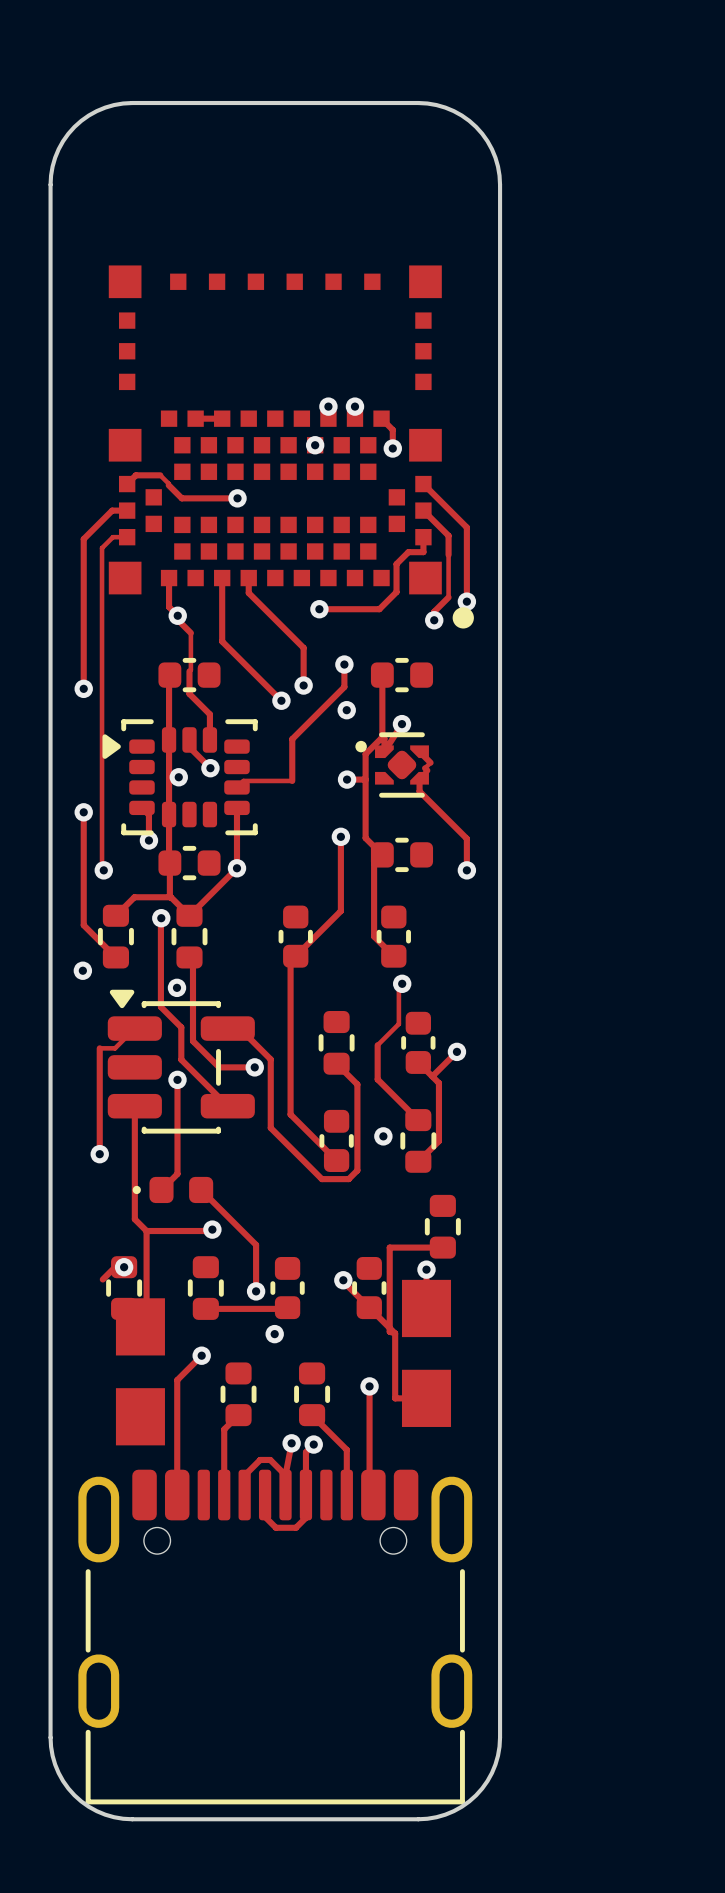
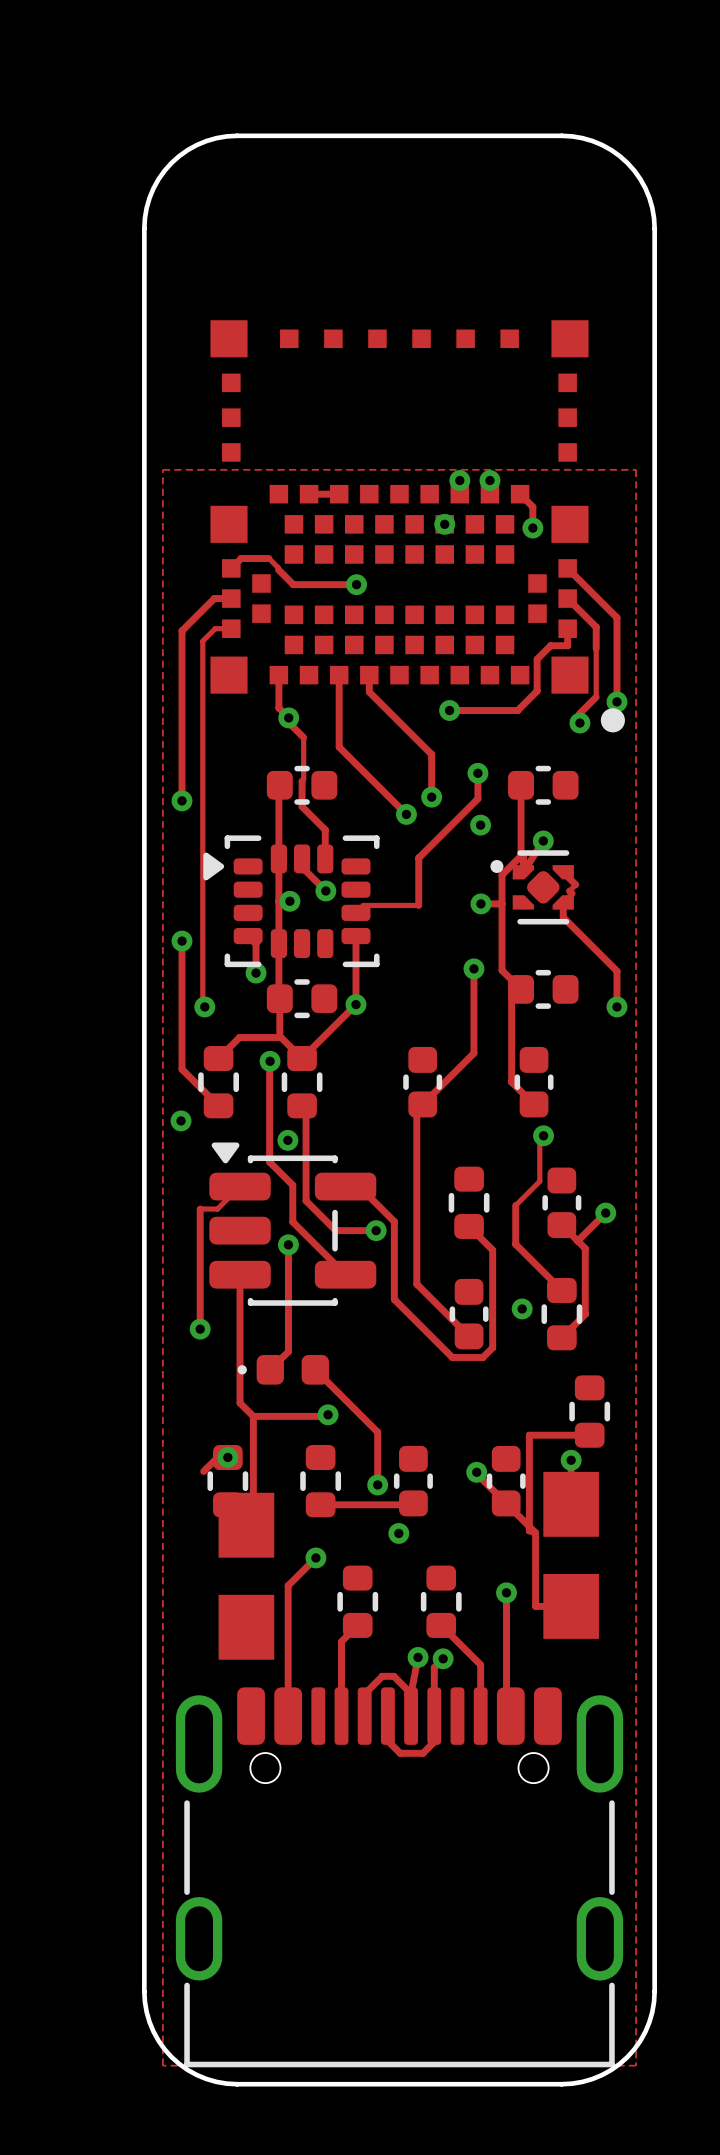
zone outline: none -> (162, 469) (636, 469) (636, 2065) (162, 2065) (162, 469)

